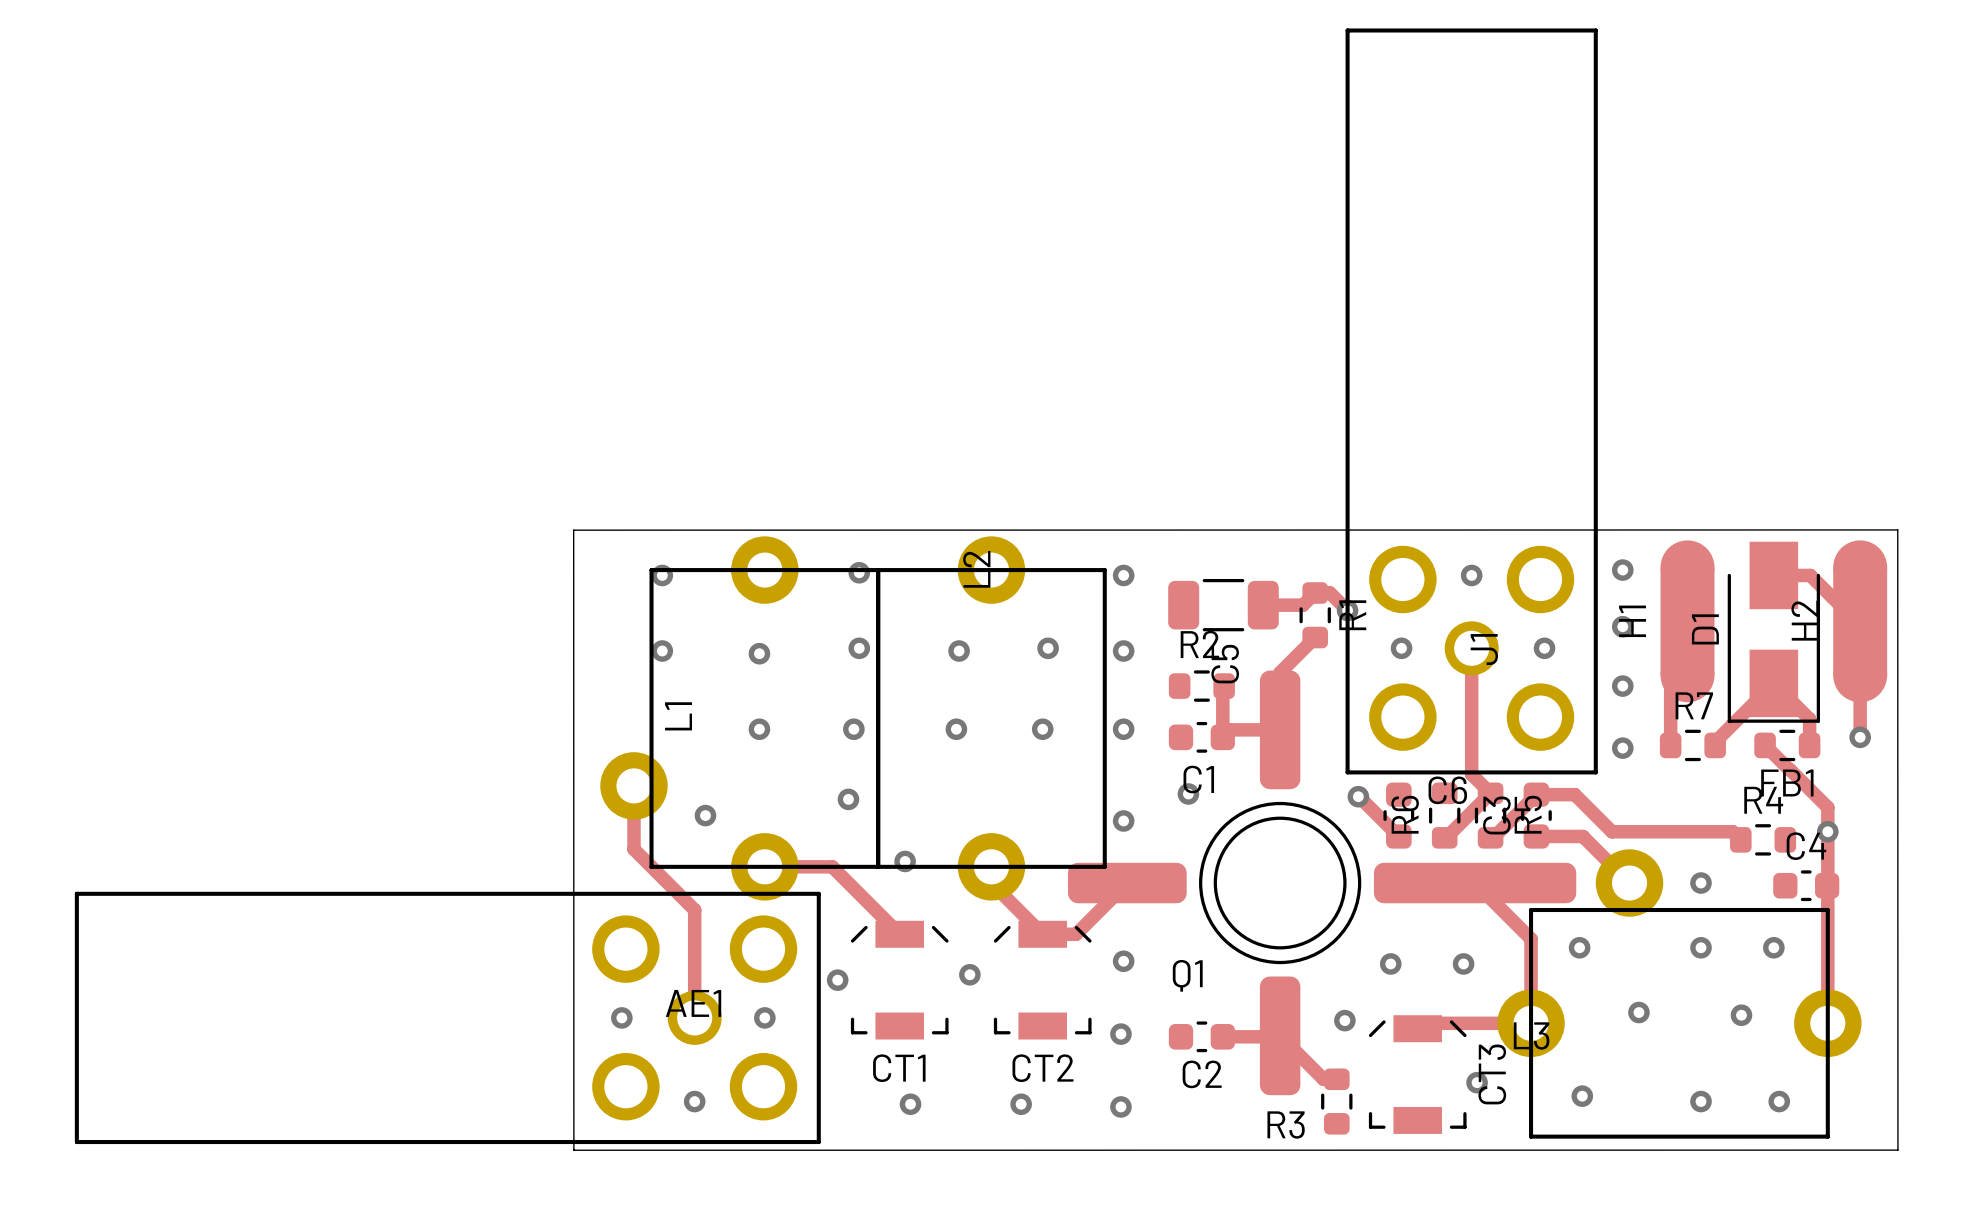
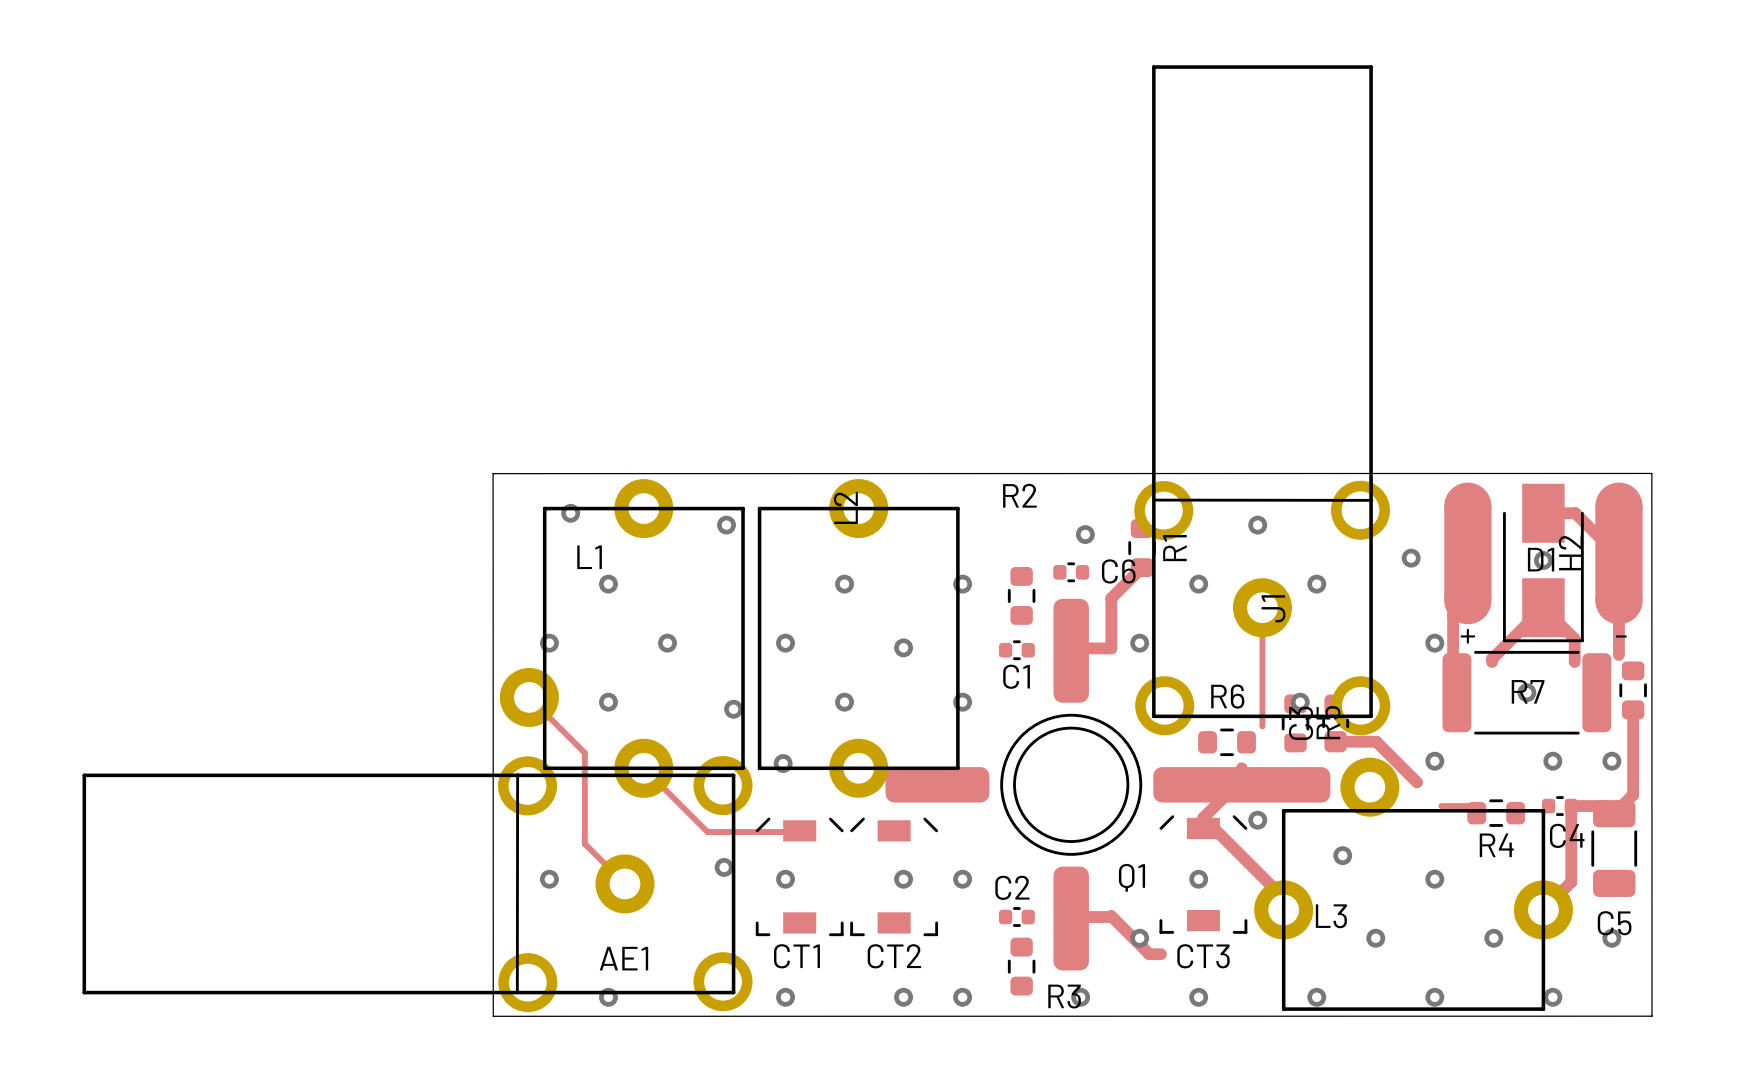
J1 footprint: [1345, 28, 1598, 775] -> [1134, 65, 1391, 736]
via: (1622, 570) -> none
via position: (859, 572) -> (726, 525)
via: (1123, 575) -> none
via position: (1471, 575) -> (1257, 525)
via: none -> (1085, 534)
C5 rotation: 0° (1223, 605) -> 90° clockwise (1614, 848)
C5 position: (1223, 605) -> (1614, 848)
track: (1263, 605) (1303, 605) (1315, 593) (1330, 593) (1347, 610) -> none
via: (1347, 610) -> none
H1 name: H1 (1632, 621) -> none
D1 name rotation: 0° (1705, 629) -> 90° clockwise (1541, 559)
via: none -> (1543, 560)
R2 name position: R2 (1199, 644) -> R2 (1019, 495)
via: (859, 648) -> none
via: (1048, 648) -> none
via position: (1401, 648) -> (1198, 584)
track: (1471, 648) (1471, 774) (1490, 793) (1444, 837) -> none
via position: (1544, 648) -> (1316, 584)
via: (662, 651) -> none
via position: (959, 651) -> (844, 584)
via position: (1123, 651) -> (962, 584)
via: (759, 653) -> none
via: none -> (608, 584)
track: none -> (1262, 607) (1262, 726)
R2 rotation: 0° (1201, 686) -> 90° clockwise (1021, 595)
via: (1622, 686) -> none
L1 name rotation: 0° (678, 716) -> 90° clockwise (589, 557)
L1 name position: L1 (678, 716) -> L1 (589, 557)
text: none -> + (1467, 636)
text: none -> - (1621, 636)
L1 position: (740, 718) -> (622, 638)
C1 footprint: [1168, 721, 1235, 753] -> [998, 640, 1035, 661]
via: none -> (549, 643)
via: none -> (785, 643)
via: none -> (1139, 643)
via: none -> (1434, 643)
via position: (759, 729) -> (667, 643)
via: (853, 729) -> none
via: (956, 729) -> none
via: (1123, 729) -> none
R7 footprint: [1659, 729, 1726, 762] -> [1442, 650, 1612, 735]
via: (1860, 737) -> none
track: (1765, 745) (1827, 807) (1827, 1023) -> none
FB1: (1787, 745) -> none
via: (1622, 748) -> none
part: none -> (1633, 690)
via: none -> (1526, 692)
C6 footprint: [1383, 782, 1415, 849] -> [1053, 562, 1090, 583]
track: none -> (529, 697) (584, 752) (584, 843) (624, 883)
track: (633, 785) (633, 849) (694, 910) (694, 1017) -> none
via: none -> (844, 702)
via: none -> (962, 702)
via: none -> (1300, 702)
via: (1188, 793) -> none
track: (1358, 796) (1398, 836) -> none
via: (1358, 796) -> none
R4 name position: R4 (1763, 800) -> R4 (1496, 845)
track: none -> (1633, 709) (1633, 794) (1614, 813) (1606, 806) (1571, 806) (1571, 882) (1543, 909)
via position: (705, 815) -> (608, 702)
R6 rotation: 0° (1444, 815) -> 90° clockwise (1227, 742)
via: (1123, 820) -> none
via: (1827, 831) -> none
track: (1490, 837) (1493, 837) (1536, 794) (1574, 794) (1611, 831) (1732, 831) (1740, 839) -> none
R4 position: (1763, 839) -> (1496, 813)
C4 name position: C4 (1806, 846) -> C4 (1567, 835)
via: none -> (1434, 761)
via: none -> (1552, 761)
via: none -> (1611, 761)
track: none -> (643, 768) (707, 832) (799, 832)
track: (764, 866) (832, 866) (899, 934) -> none
track: (991, 866) (991, 883) (1042, 934) (1076, 934) (1127, 883) -> none
track: none -> (1241, 768) (1241, 779) (1203, 817) (1283, 898)
C4 footprint: [1773, 870, 1840, 902] -> [1541, 796, 1578, 816]
Q1 position: (1322, 882) -> (1107, 784)
track: (1475, 883) (1531, 938) (1531, 1023) (1423, 1023) (1417, 1028) -> none
via: (1701, 883) -> none
AE1 footprint: [74, 891, 821, 1145] -> [82, 756, 753, 1013]
track: none -> (1441, 806) (1469, 806) (1476, 813)
CT1 footprint: [850, 920, 949, 1040] -> [755, 817, 844, 937]
CT2 footprint: [993, 920, 1092, 1040] -> [850, 817, 939, 937]
via: none -> (1257, 820)
via position: (1579, 947) -> (1342, 855)
via: (1701, 947) -> none
via: (1773, 947) -> none
via: (1123, 961) -> none
via: (1390, 963) -> none
via: (1463, 963) -> none
via: (969, 974) -> none
Q1 name position: Q1 (1187, 975) -> Q1 (1132, 877)
via: none -> (785, 879)
via: none -> (903, 879)
via: none -> (962, 879)
via: none -> (1198, 879)
L3 position: (1679, 993) -> (1413, 884)
AE1 name position: AE1 (693, 1003) -> AE1 (623, 958)
via position: (1638, 1012) -> (1434, 879)
CT3 footprint: [1368, 1015, 1467, 1134] -> [1159, 815, 1248, 934]
via: (1741, 1015) -> none
via position: (621, 1017) -> (549, 879)
via: (764, 1017) -> none
via: (1344, 1020) -> none
C2 footprint: [1168, 1021, 1235, 1053] -> [998, 907, 1035, 927]
via: (1120, 1034) -> none
via: none -> (1139, 938)
via: none -> (1493, 938)
via: none -> (1611, 938)
C2 name position: C2 (1202, 1074) -> C2 (1012, 887)
CT3 name position: CT3 (1492, 1074) -> CT3 (1203, 956)
via: (1477, 1082) -> none
via position: (1582, 1096) -> (1375, 938)
via position: (694, 1101) -> (608, 997)
R3 position: (1336, 1101) -> (1021, 966)
via: (1701, 1101) -> none
via position: (1779, 1101) -> (1552, 997)
via position: (910, 1104) -> (785, 997)
via position: (1021, 1104) -> (903, 997)
via position: (1120, 1106) -> (962, 997)
R3 name position: R3 (1286, 1124) -> R3 (1064, 996)
via: none -> (1080, 997)
via: none -> (1198, 997)
via: none -> (1316, 997)
via: none -> (1434, 997)

